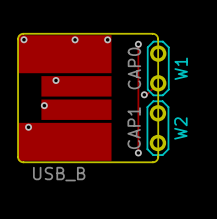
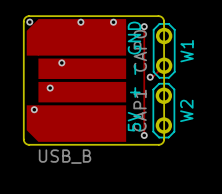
part footprint: [18, 35, 112, 161] -> [26, 19, 127, 142]

